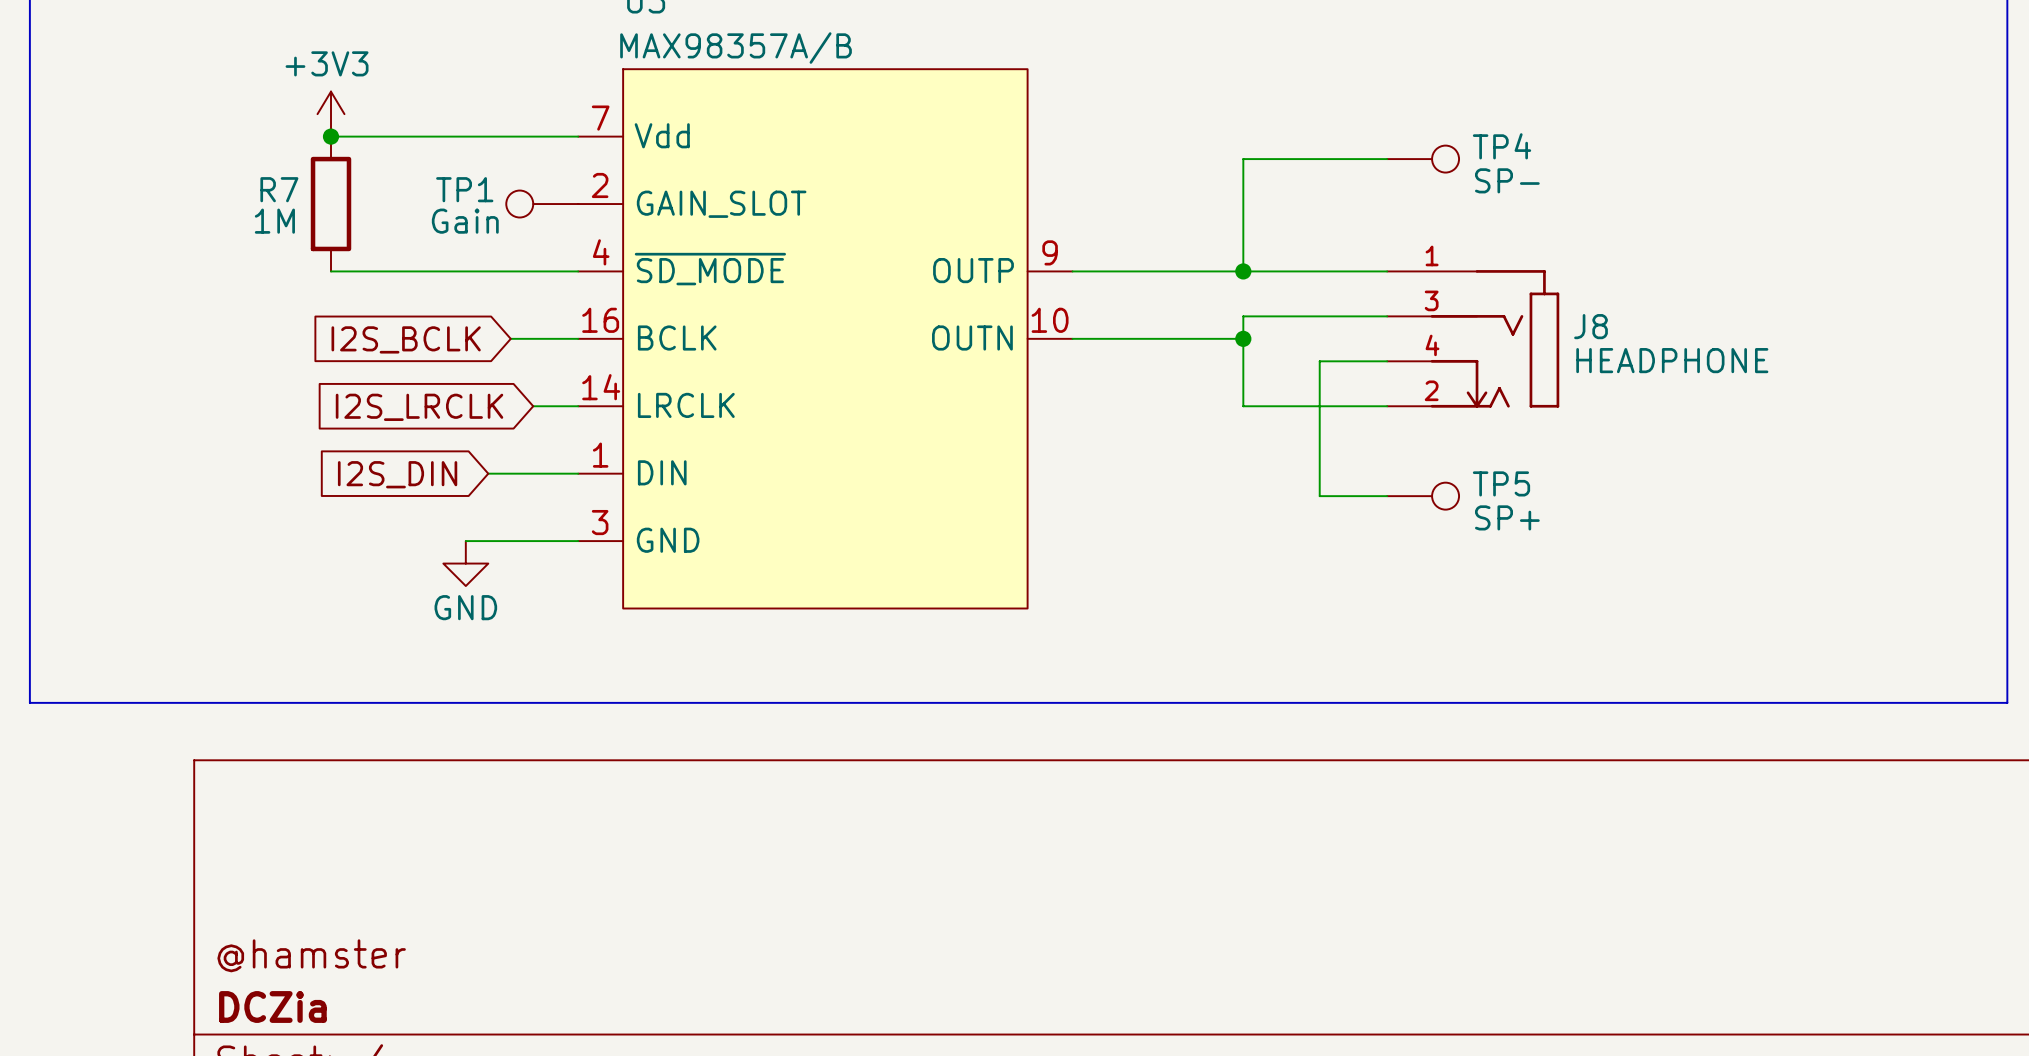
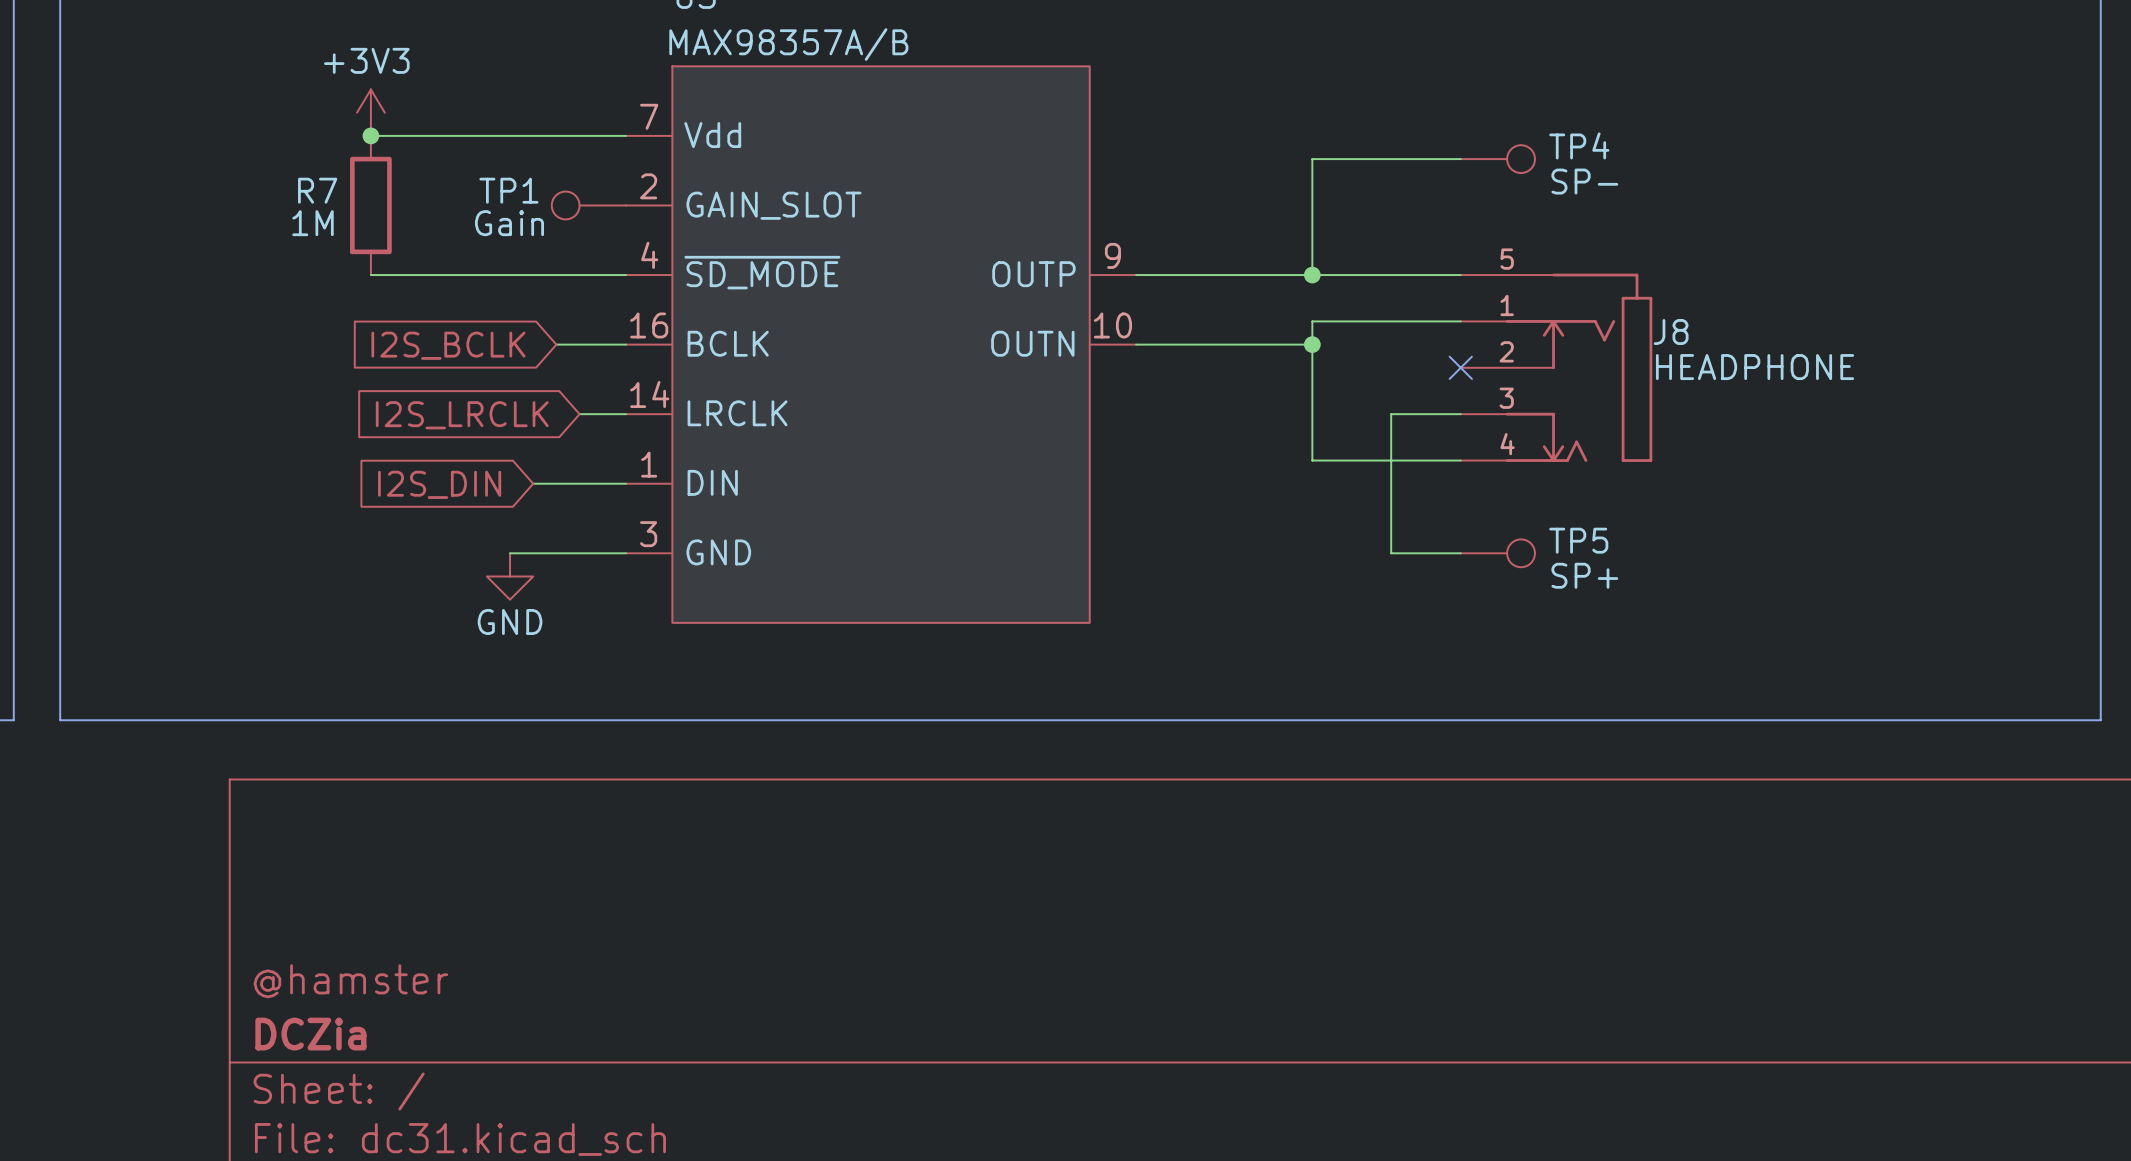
J8 symbol: [1387, 270, 1560, 408] -> [1460, 273, 1653, 462]
wire: (1387, 361) (1319, 361) (1319, 406) (1243, 406) -> (1460, 460) (1312, 460) (1312, 414)
no-connect mark: none -> (1460, 367)
wire: (1319, 496) (1387, 496) -> (1391, 506) (1391, 553) (1460, 553)
TP5 position: (1423, 496) -> (1497, 553)

